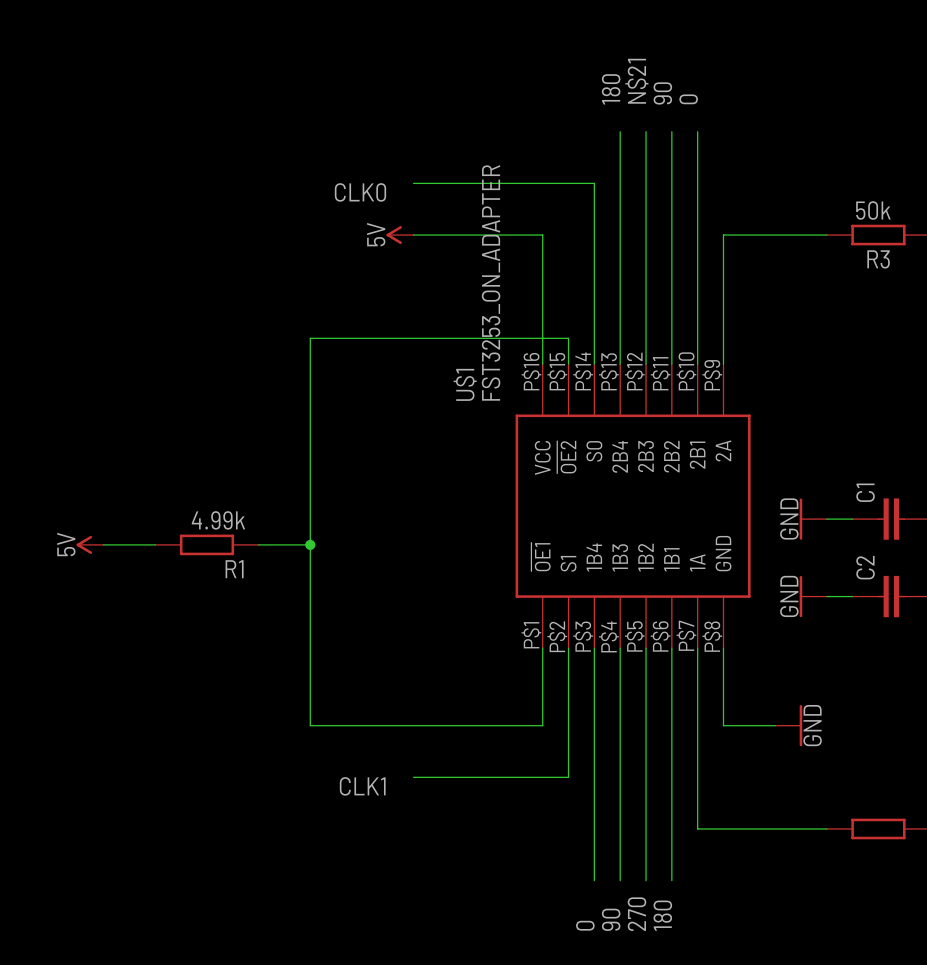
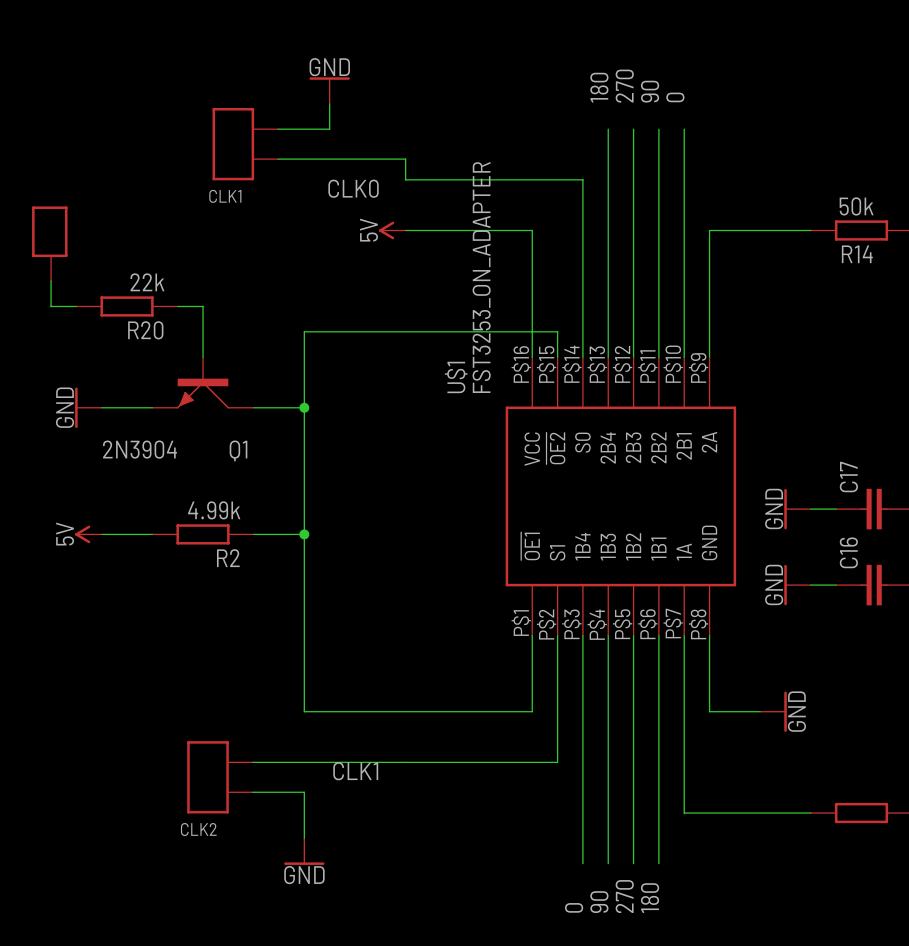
label: N$21 (636, 81) -> 270 (624, 86)
power symbol: none -> GND (329, 90)
wire: none -> (329, 103) (329, 129) (278, 129)
CLK1: none -> (245, 144)
wire: none -> (278, 159) (405, 159) (405, 179)
part: none -> (49, 243)
R3 name: R3 (878, 259) -> R14 (857, 254)
wire: none -> (51, 281) (51, 306) (76, 306)
R20: none -> 22k (127, 306)
wire: none -> (177, 306) (203, 306) (203, 357)
Q1: none -> 2N3904 (203, 382)
power symbol: none -> GND (88, 407)
wire: none -> (101, 407) (152, 407)
wire: none -> (253, 407) (304, 407)
junction: none -> (304, 407)
C1 name: C1 (865, 492) -> C17 (848, 477)
C2 name: C2 (865, 567) -> C16 (848, 552)
R1 name: R1 (234, 569) -> R2 (228, 558)
wire: none -> (252, 762) (405, 762)
CLK2: none -> (220, 777)
wire: none -> (252, 792) (304, 792) (304, 838)
power symbol: none -> GND (304, 851)

